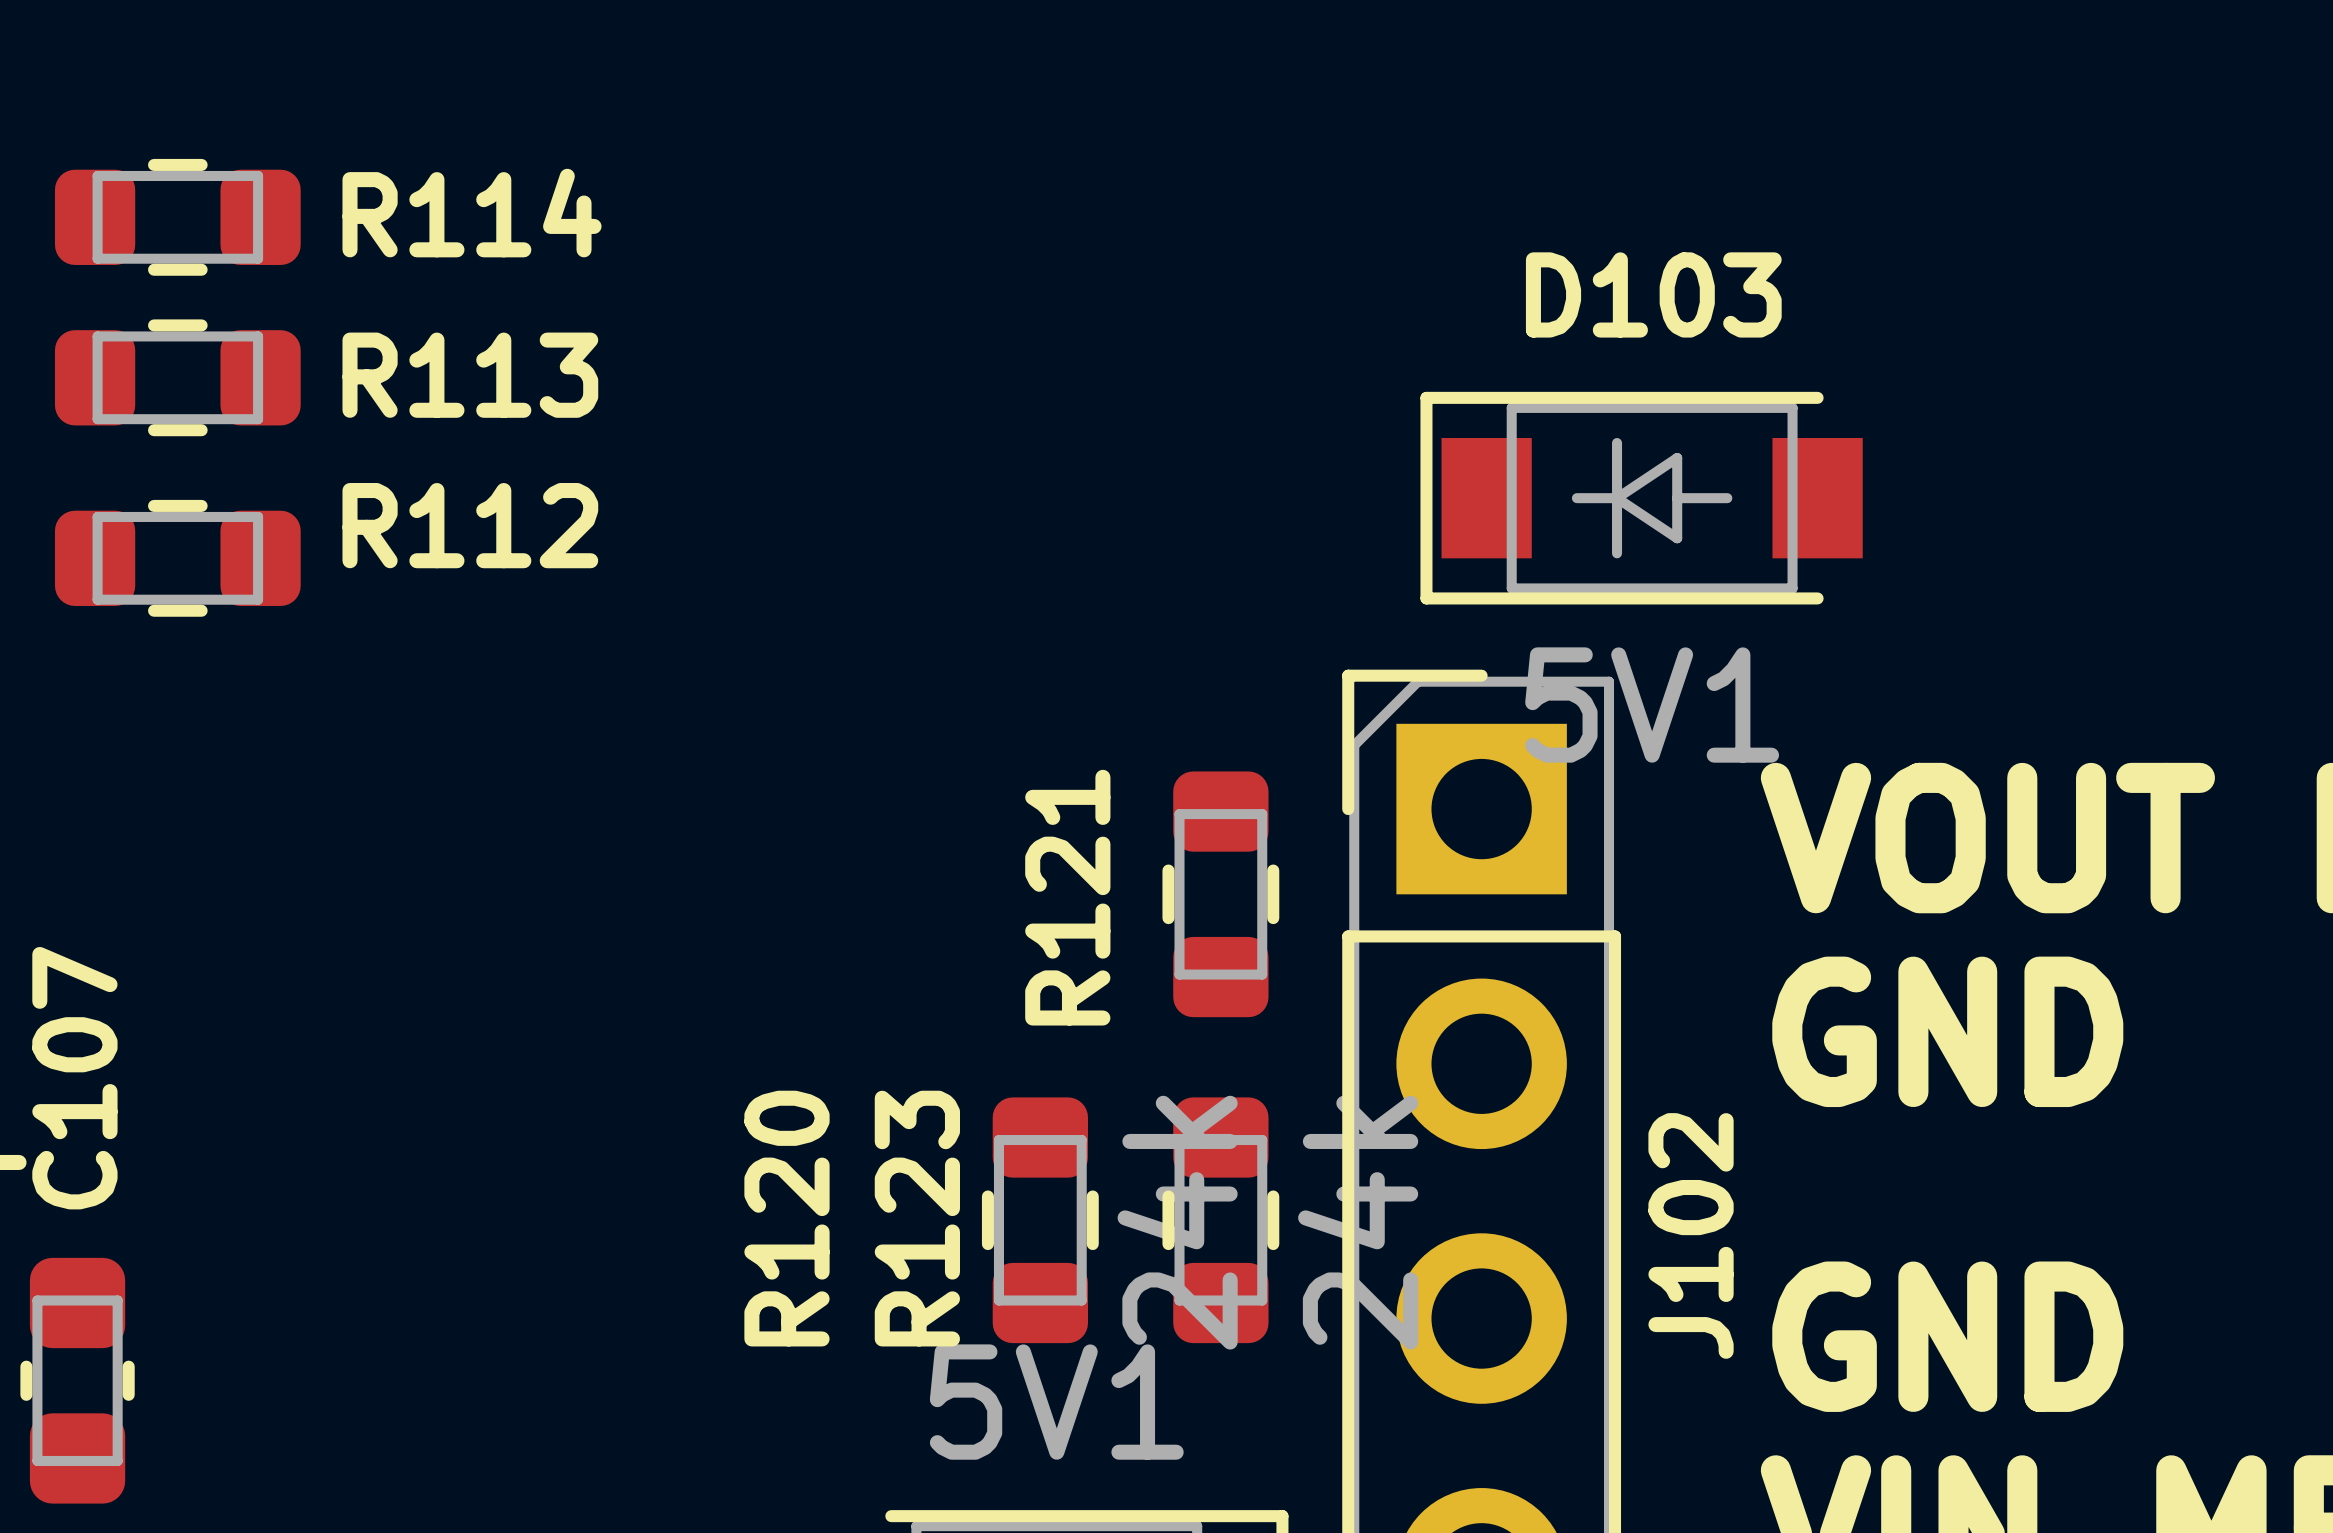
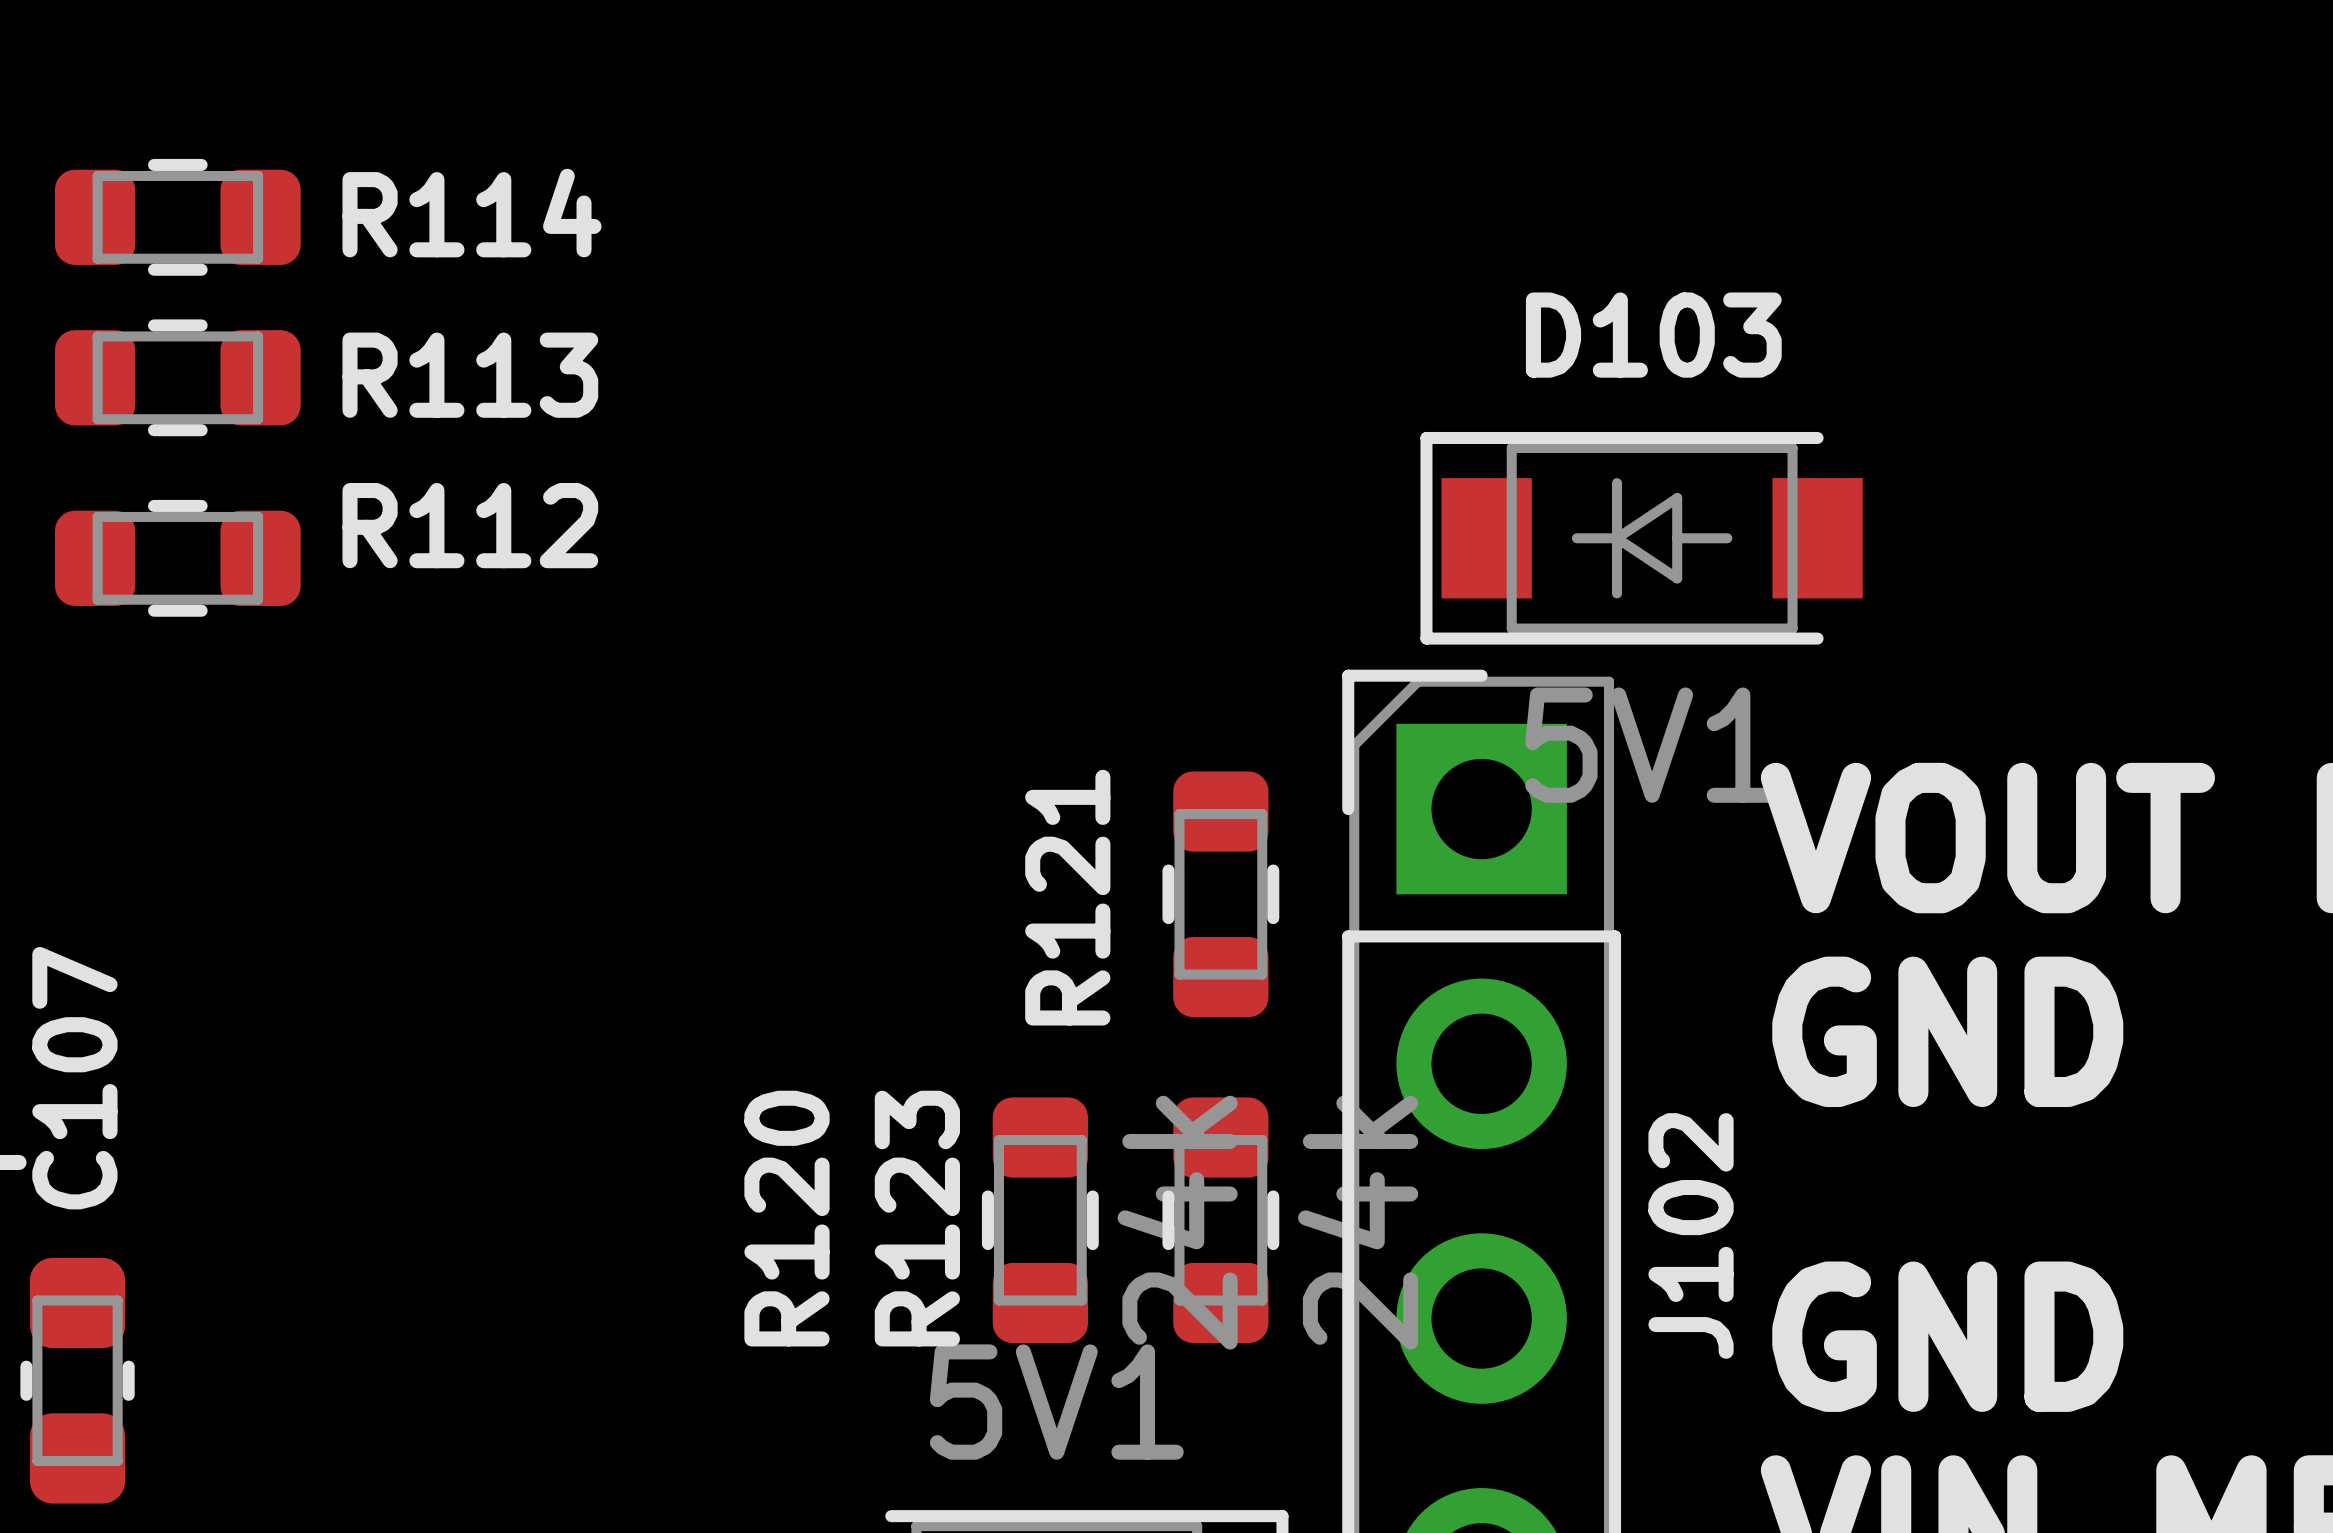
D103 position: (1641, 498) -> (1641, 538)

